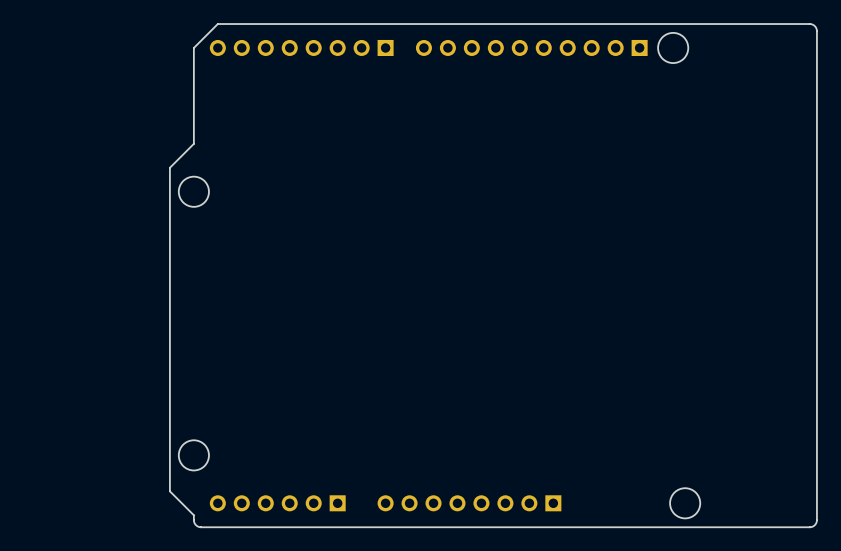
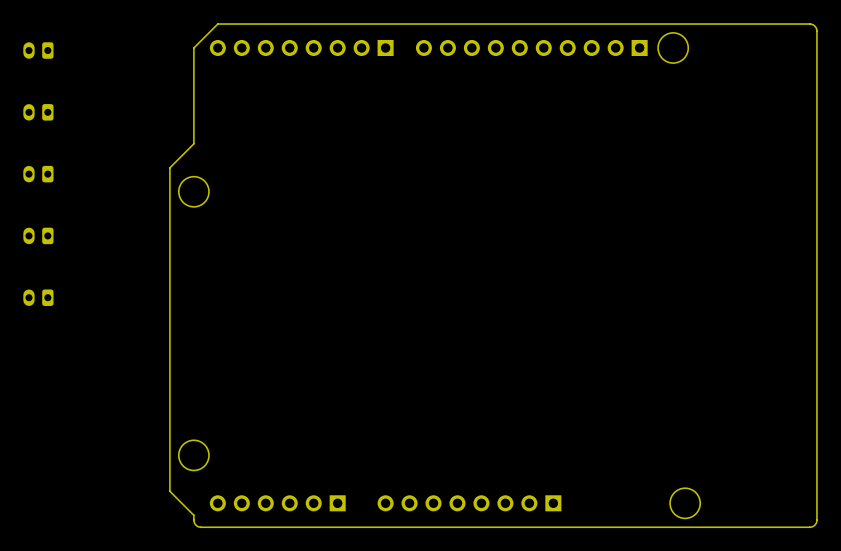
part: none -> (38, 50)
part: none -> (38, 112)
part: none -> (38, 174)
part: none -> (38, 235)
part: none -> (38, 297)

